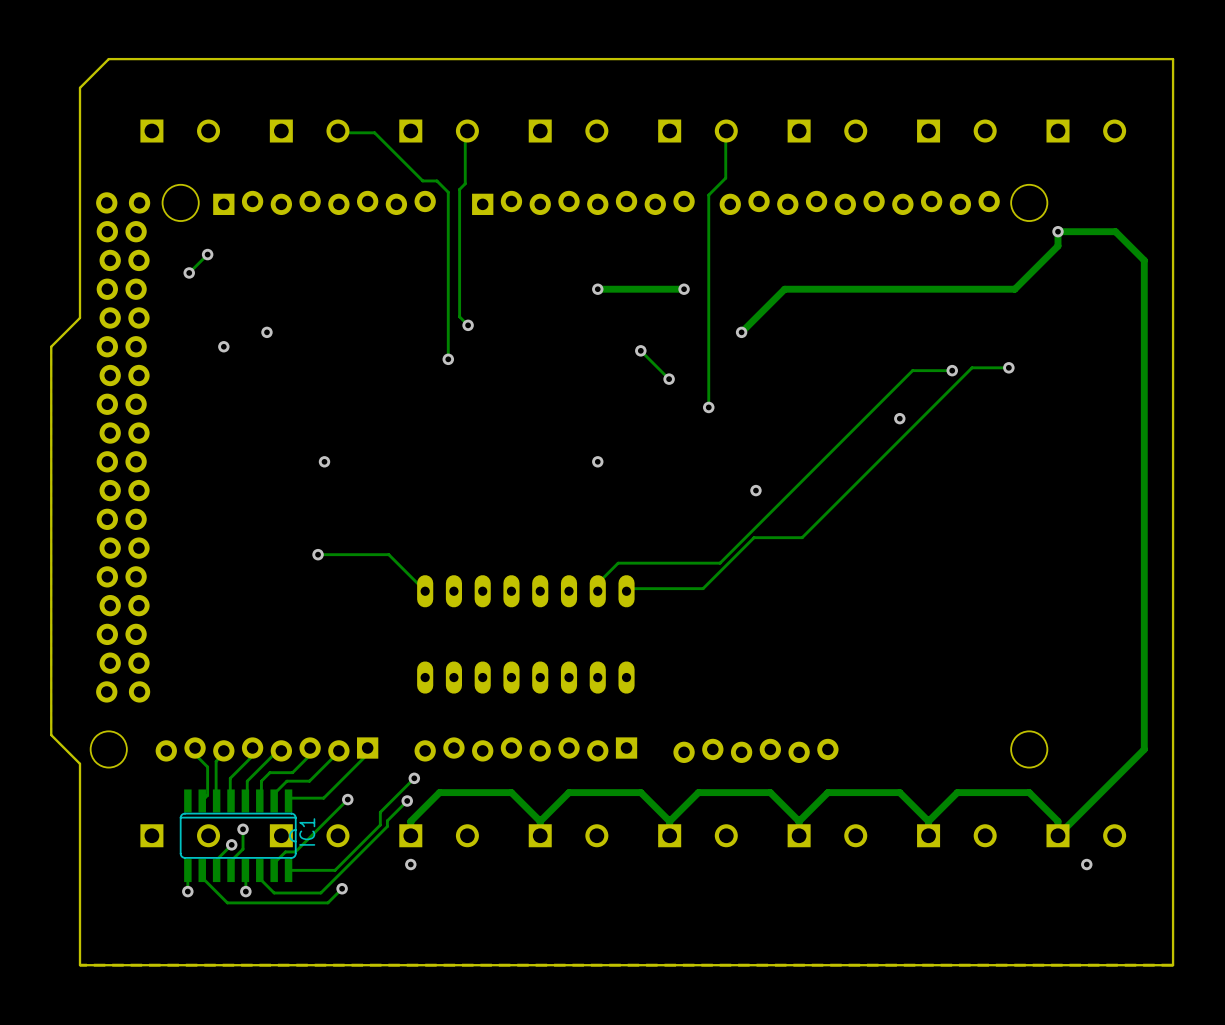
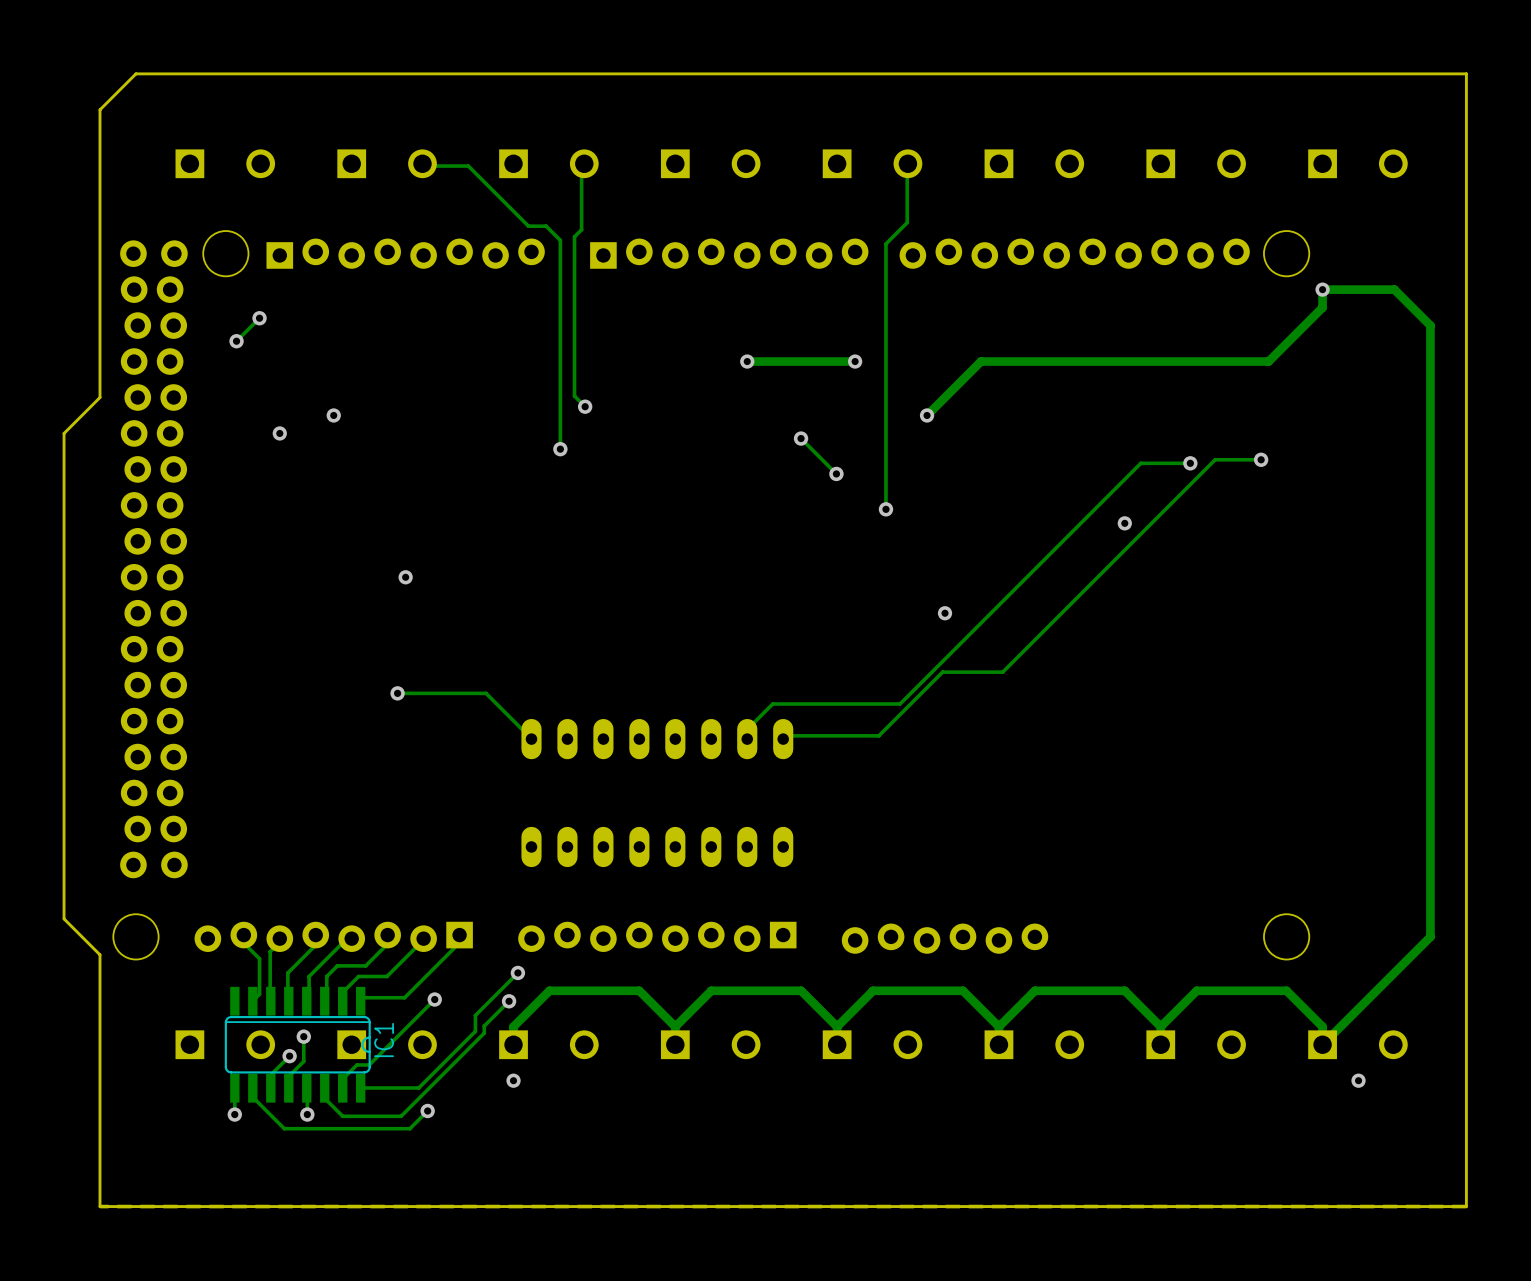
via: (597, 461) -> none

